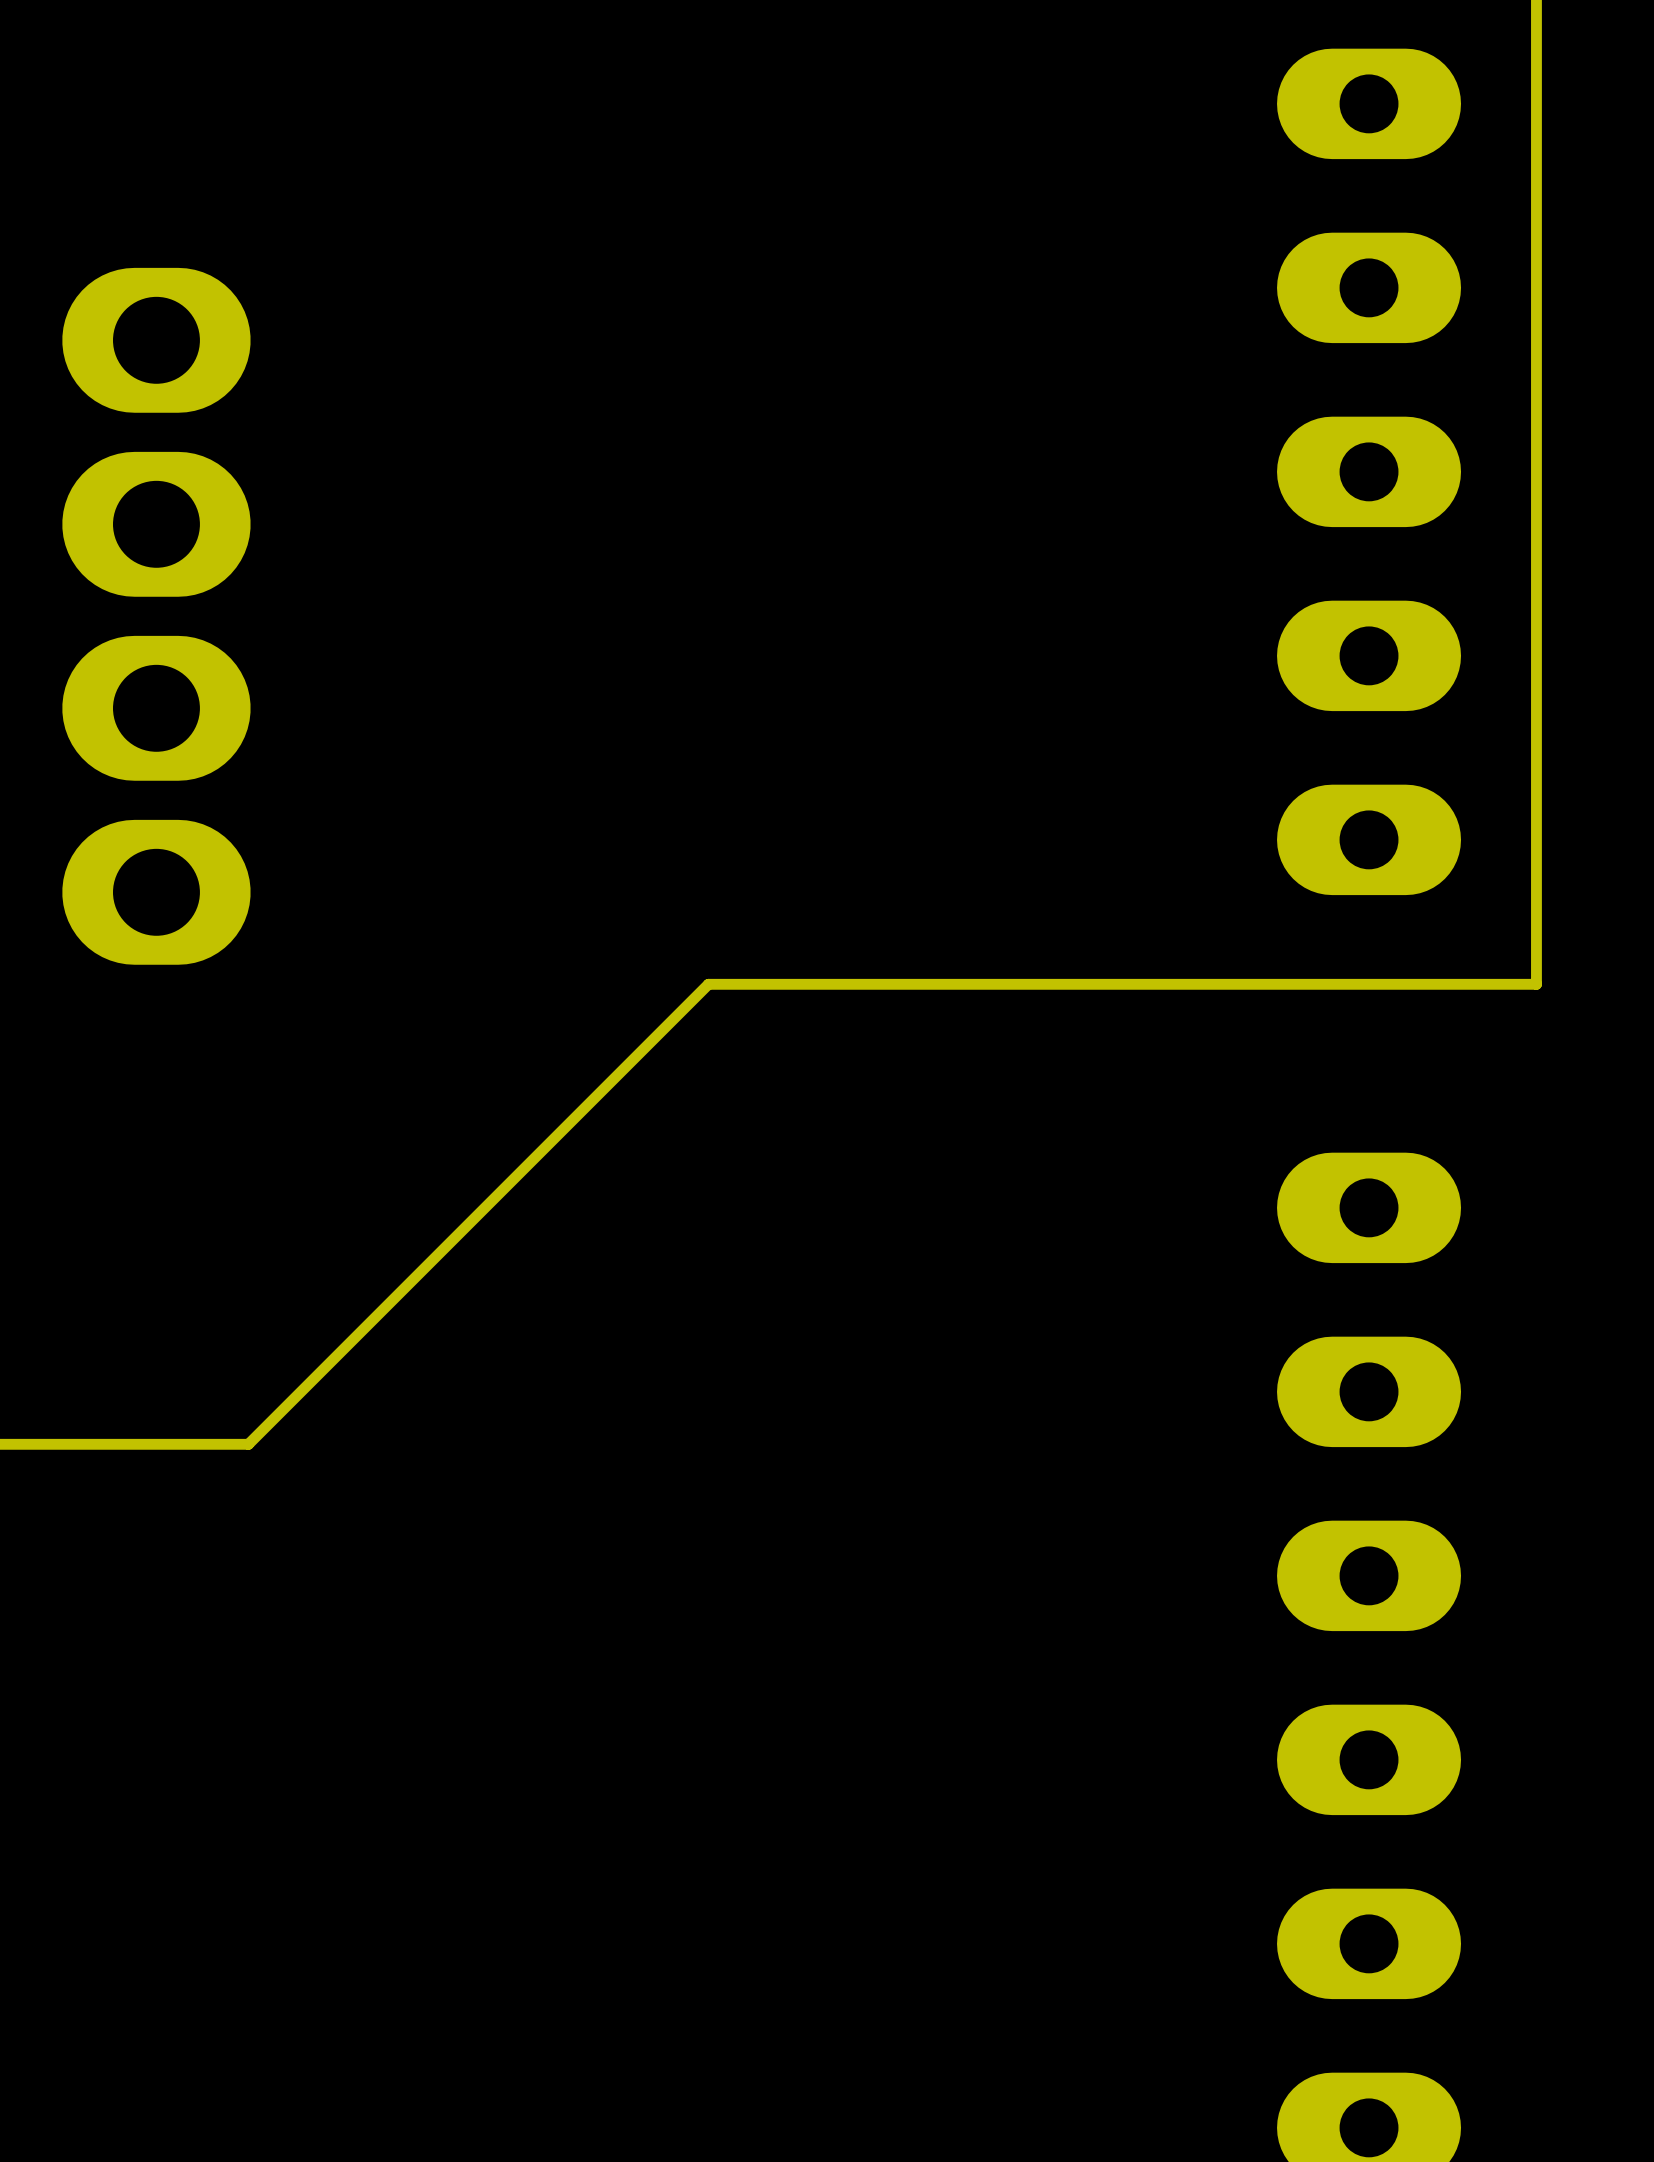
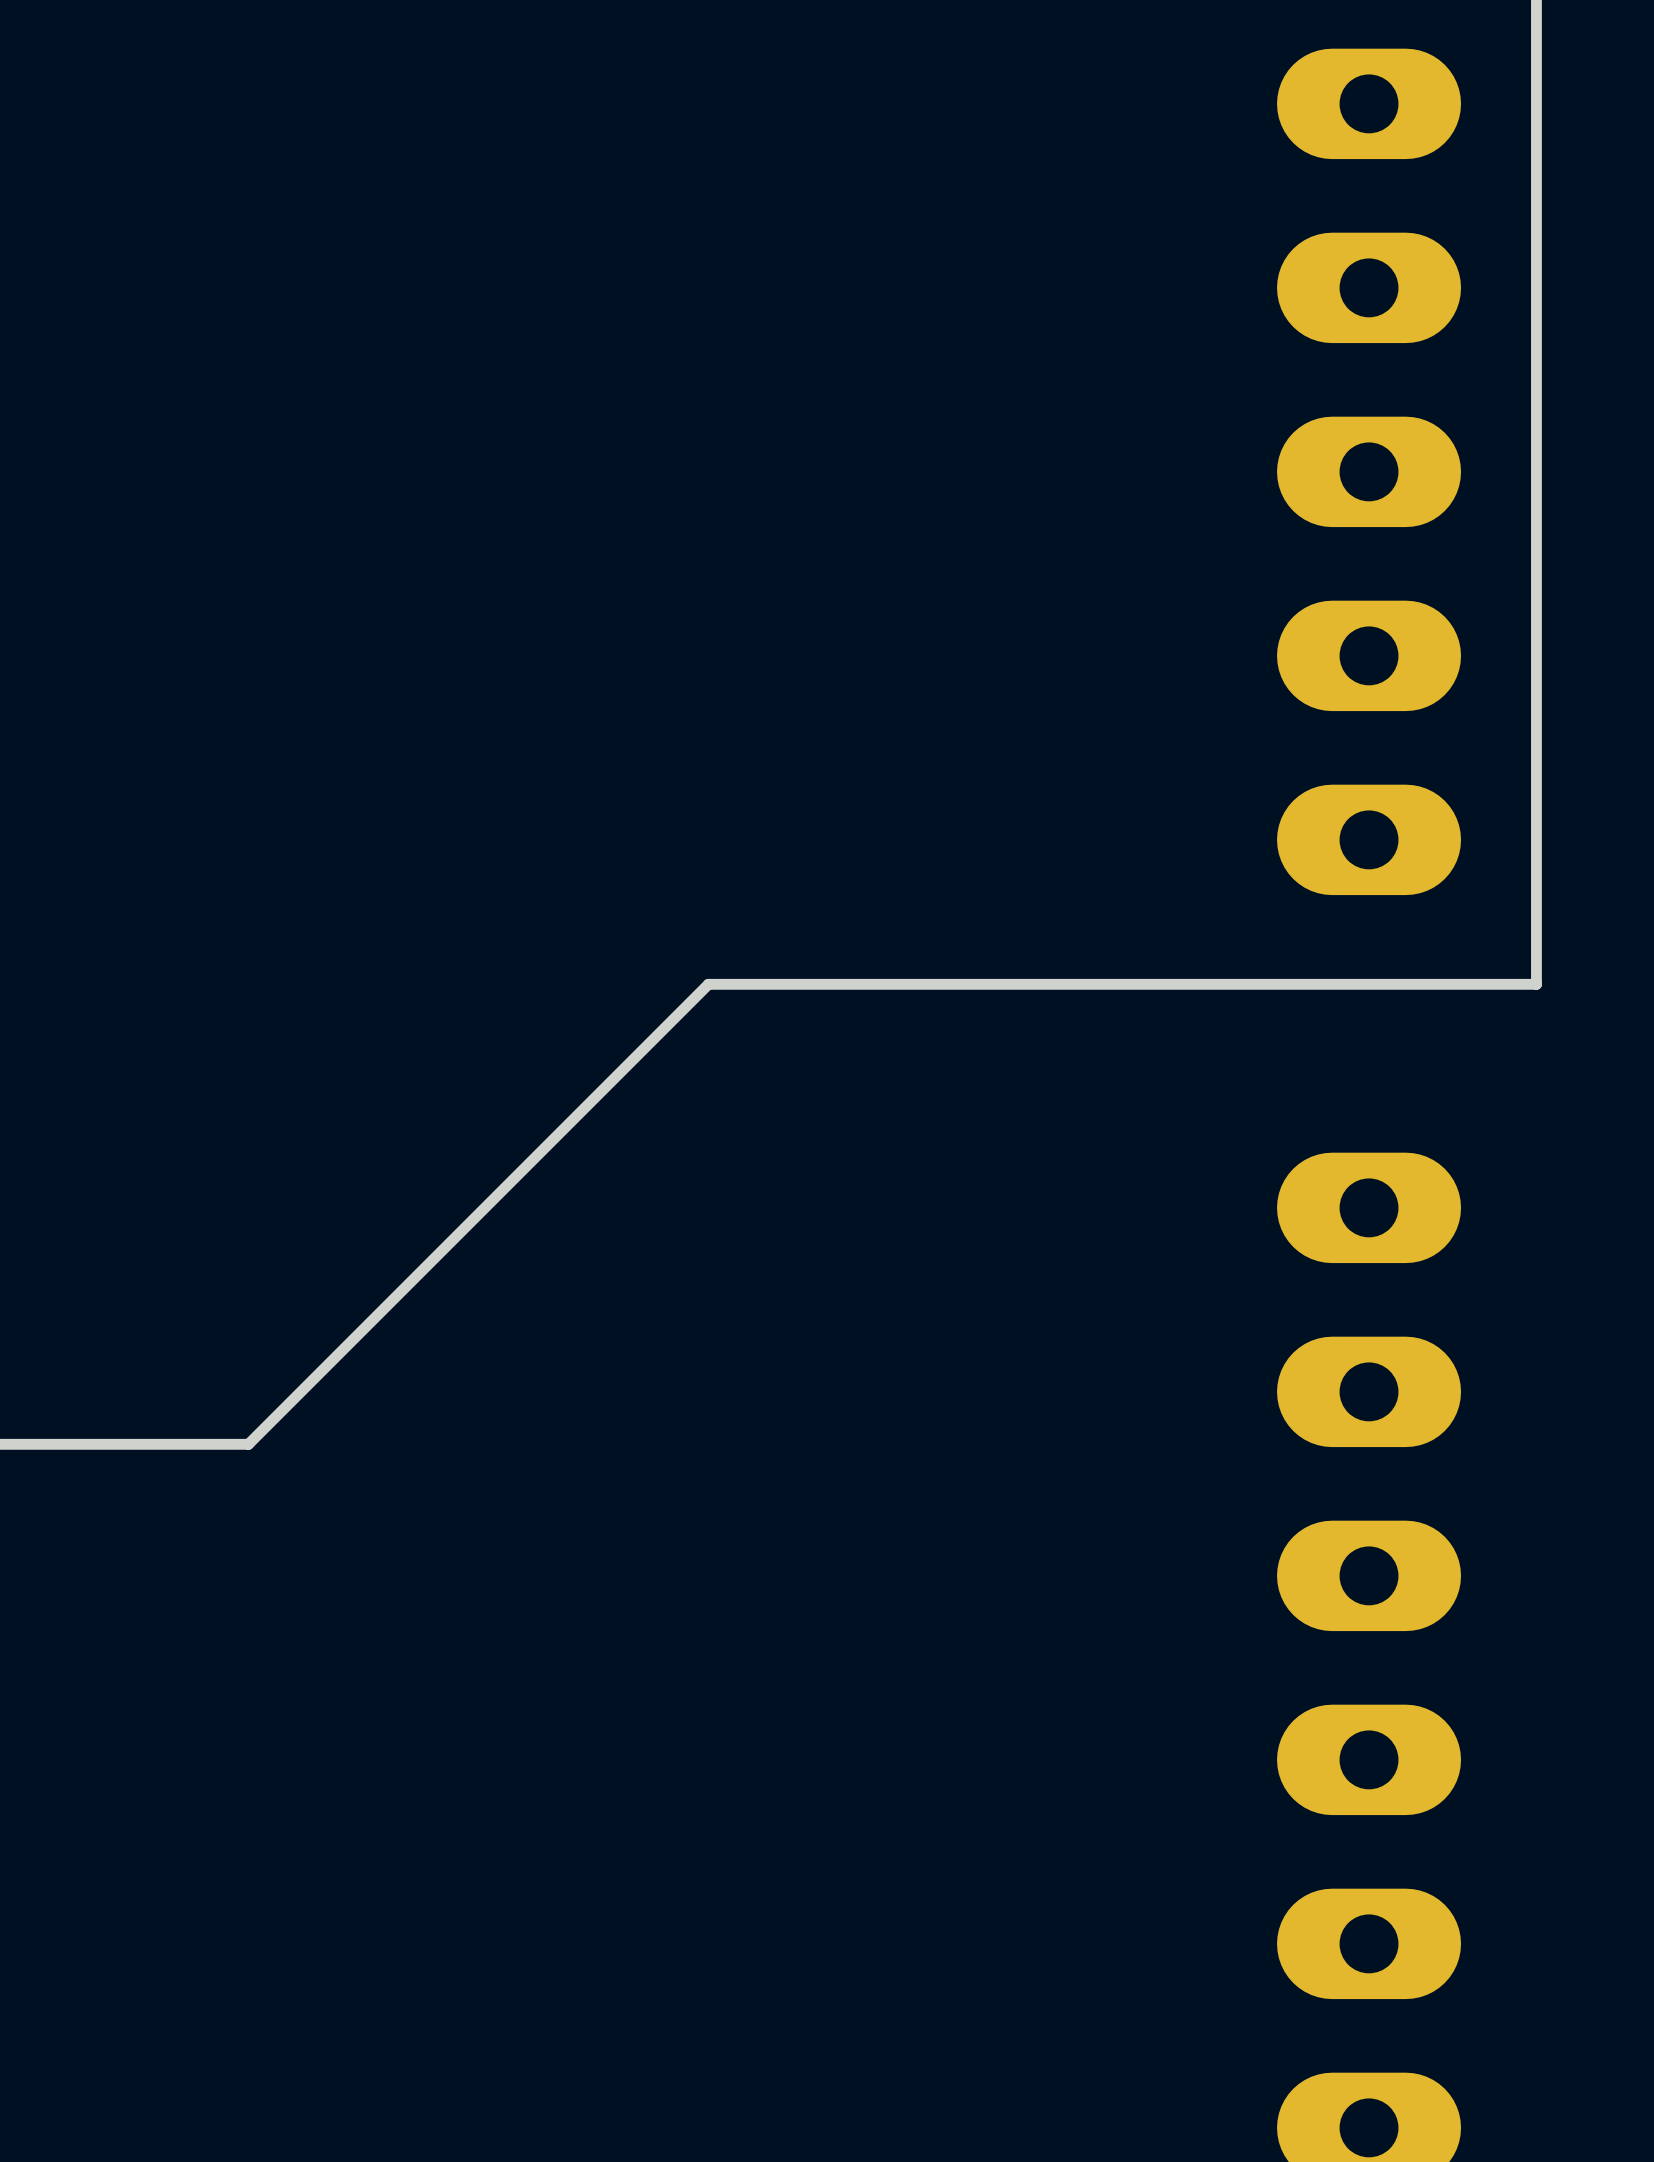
part: (156, 616) -> none

